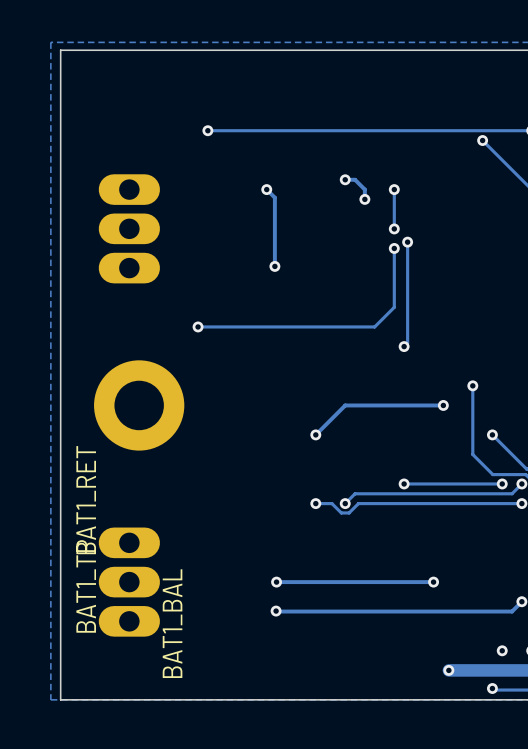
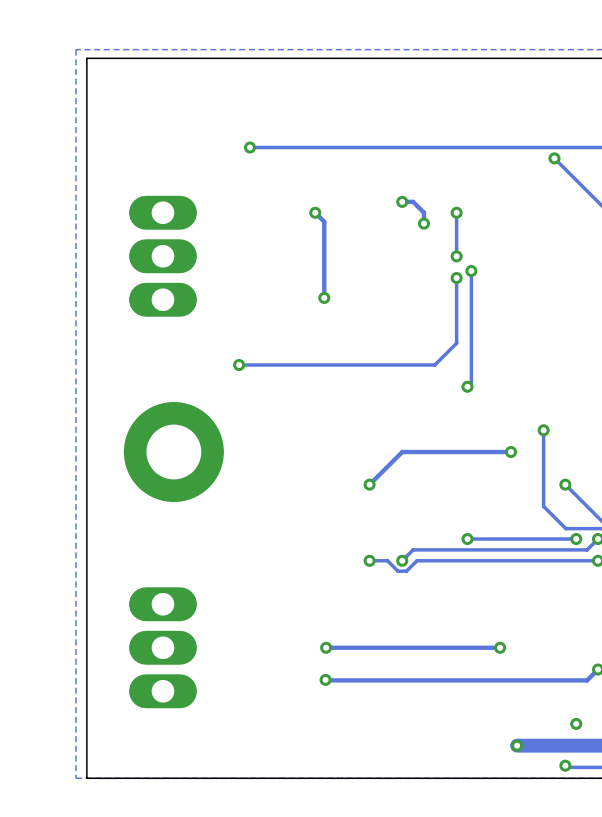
BAT1_RET name: BAT1_RET (86, 500) -> none
BAT1_TP name: BAT1_TP (86, 586) -> none
BAT1_BAL name: BAT1_BAL (172, 623) -> none

